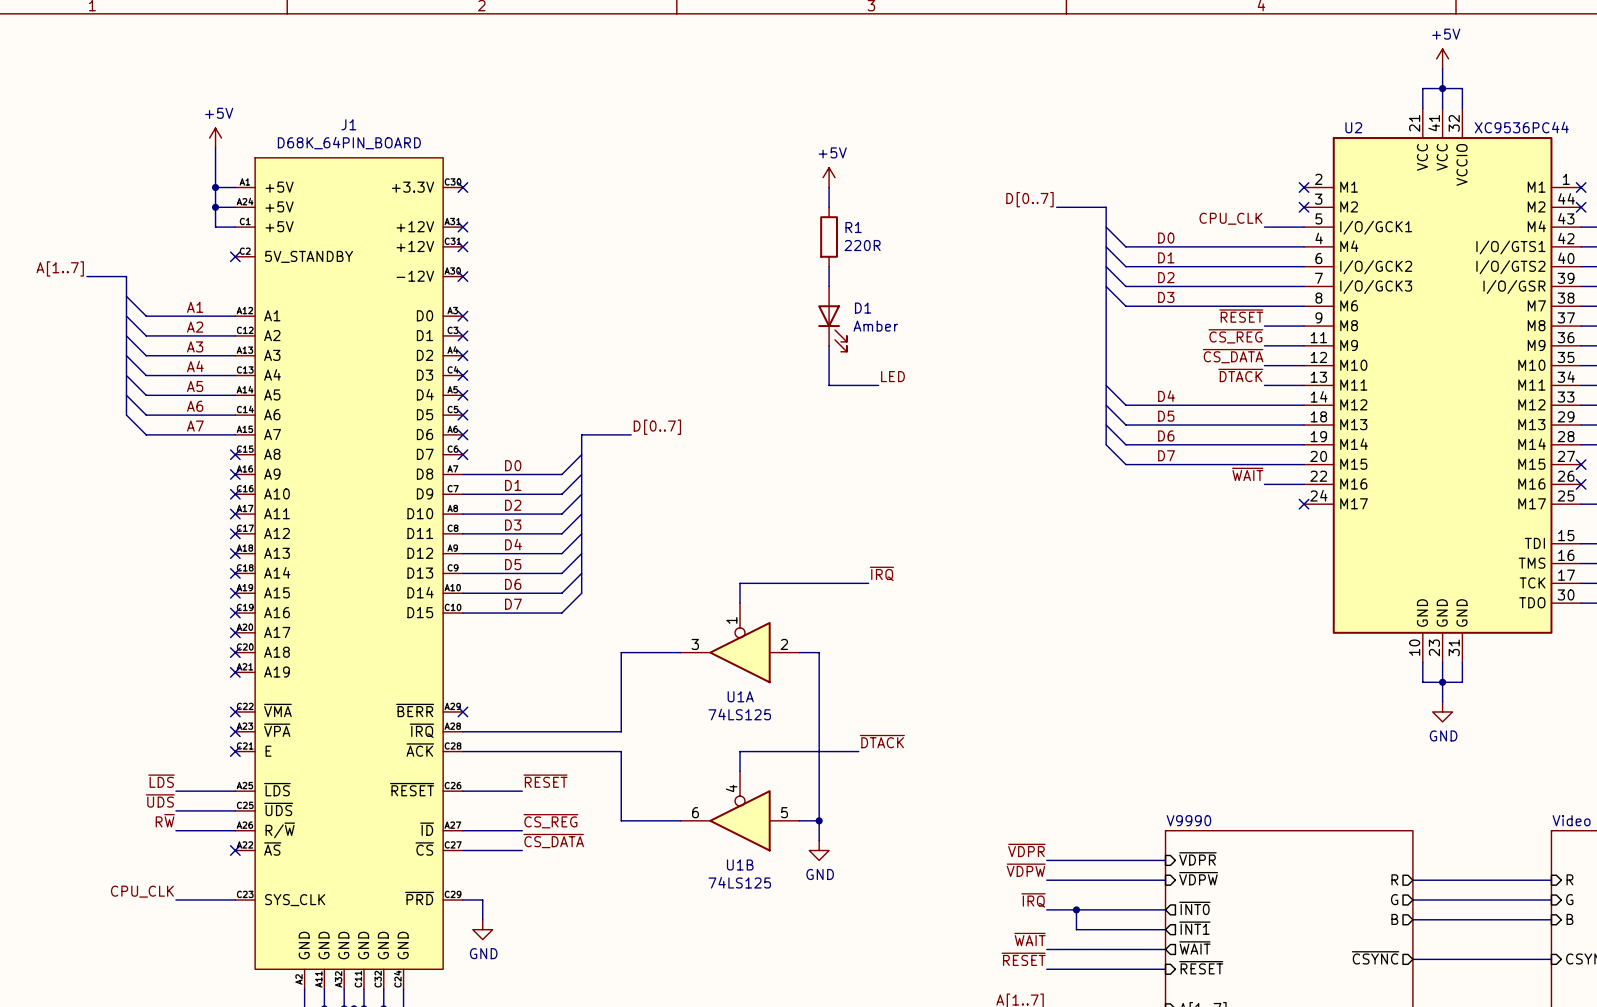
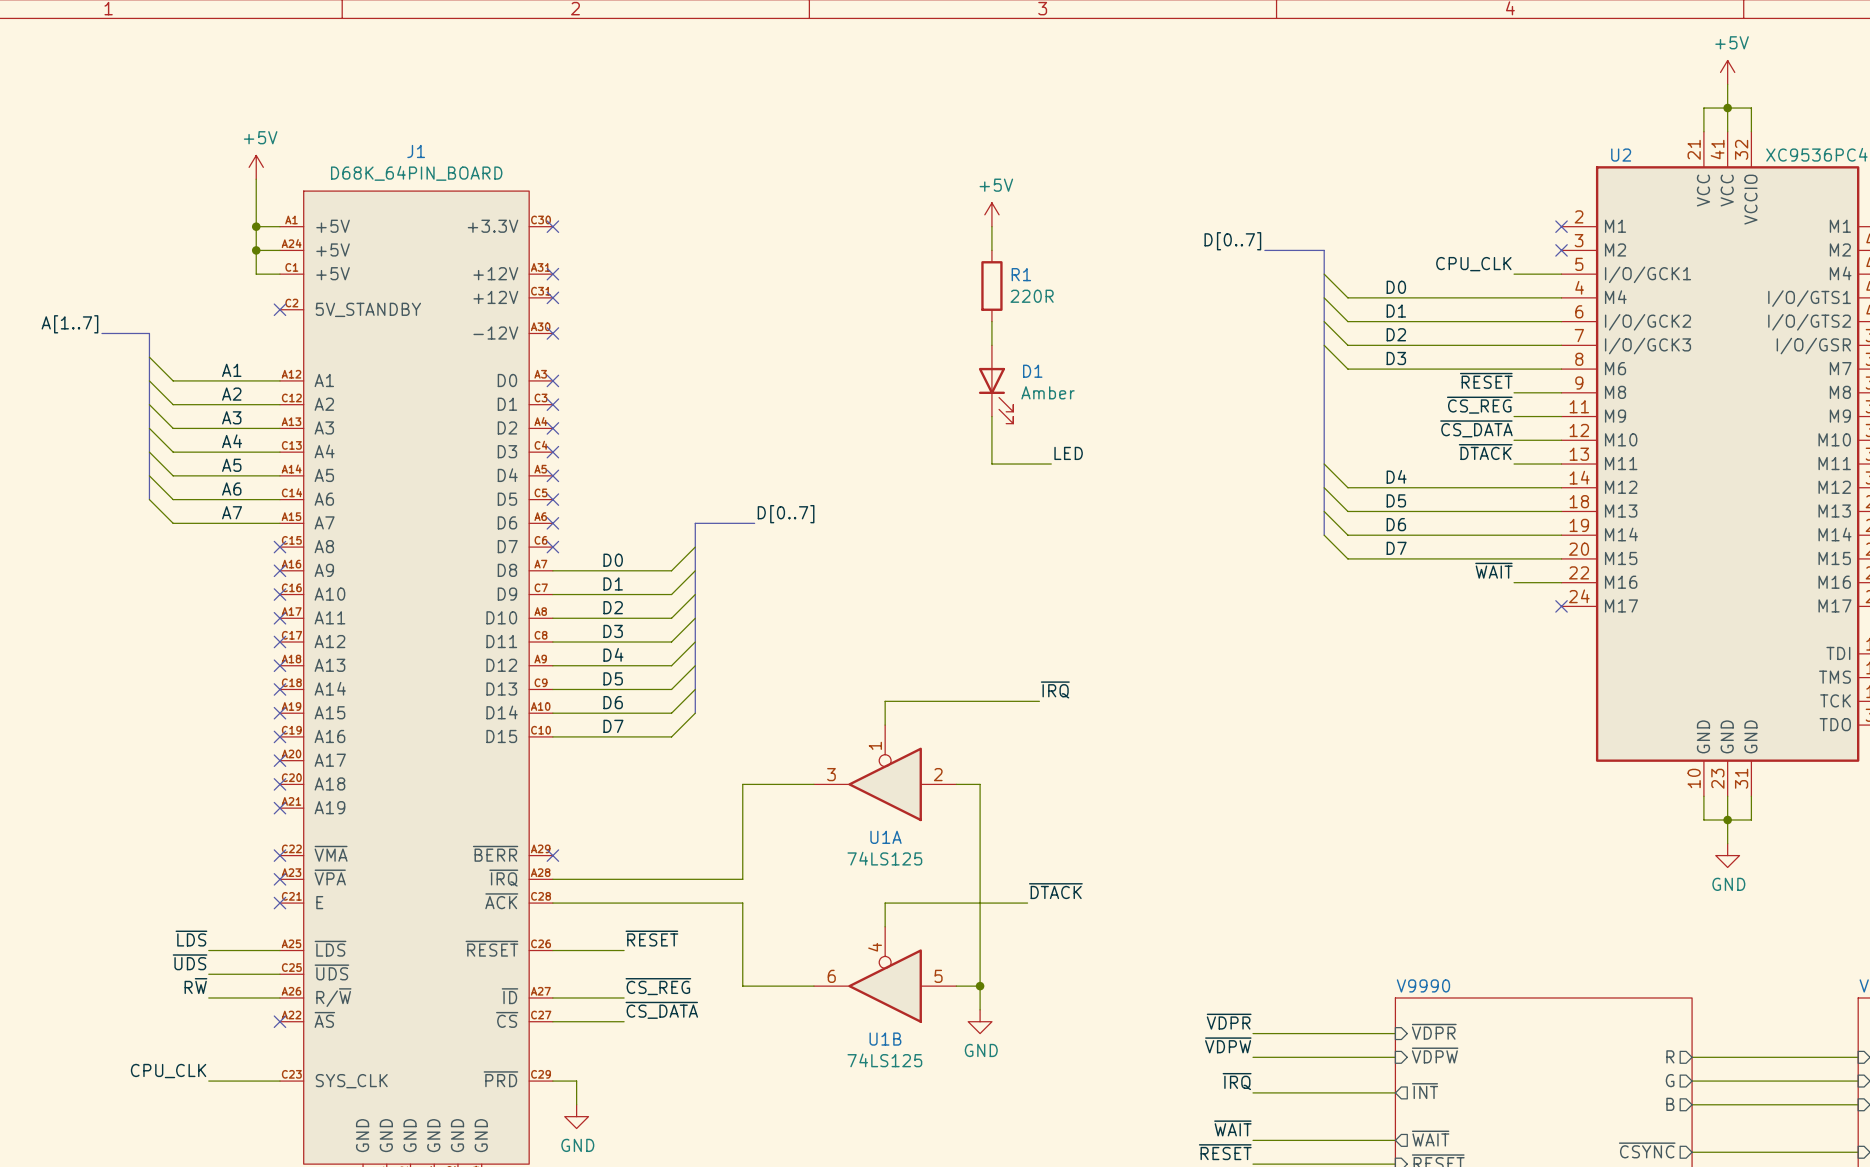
sheet pin: ~{INT0} (1194, 908) -> ~{INT} (1425, 1091)
wire: (1076, 909) (1076, 929) (1165, 929) -> none
junction: (1076, 909) -> none
sheet pin: ~{INT1} (1194, 928) -> none

